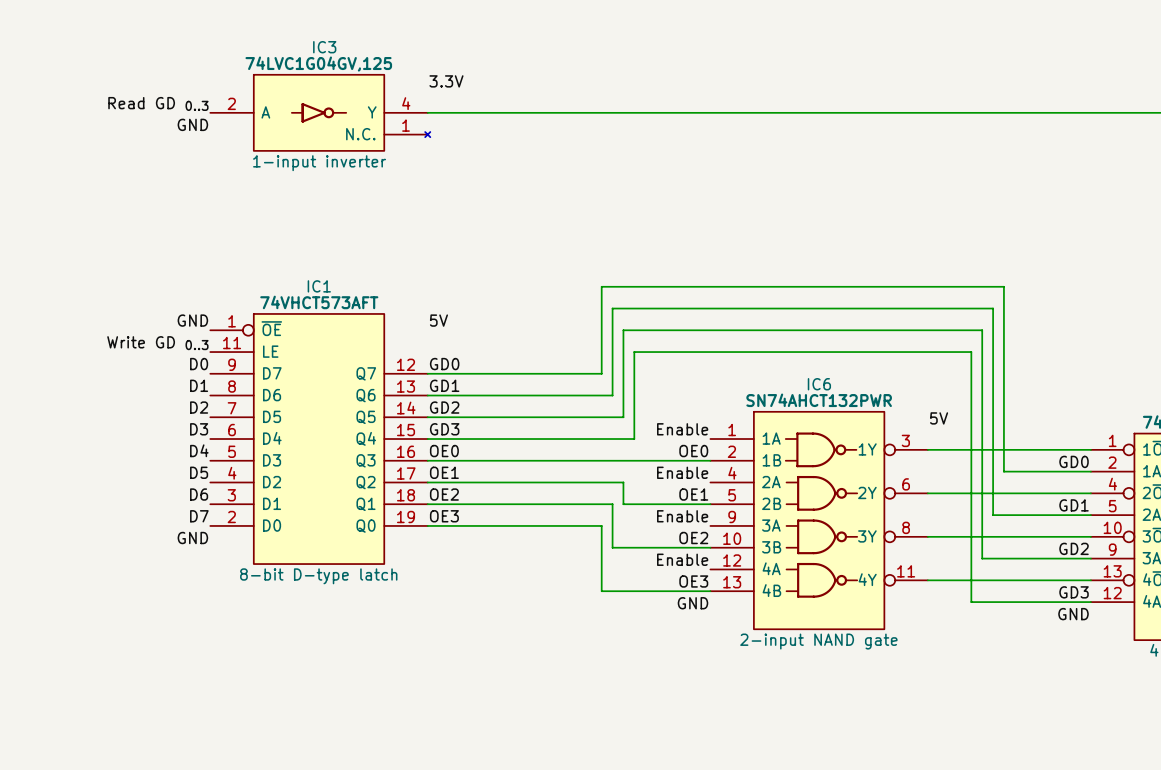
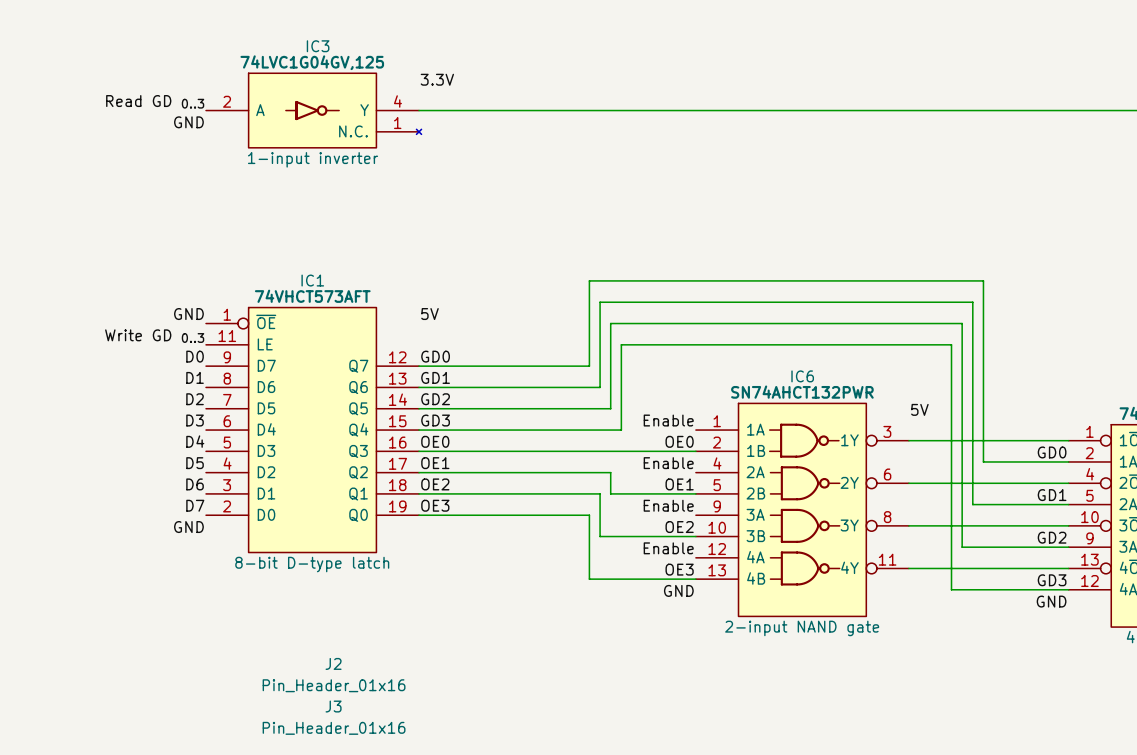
J2: none -> Pin_Header_01x16 (334, 675)
J3: none -> Pin_Header_01x16 (334, 717)

